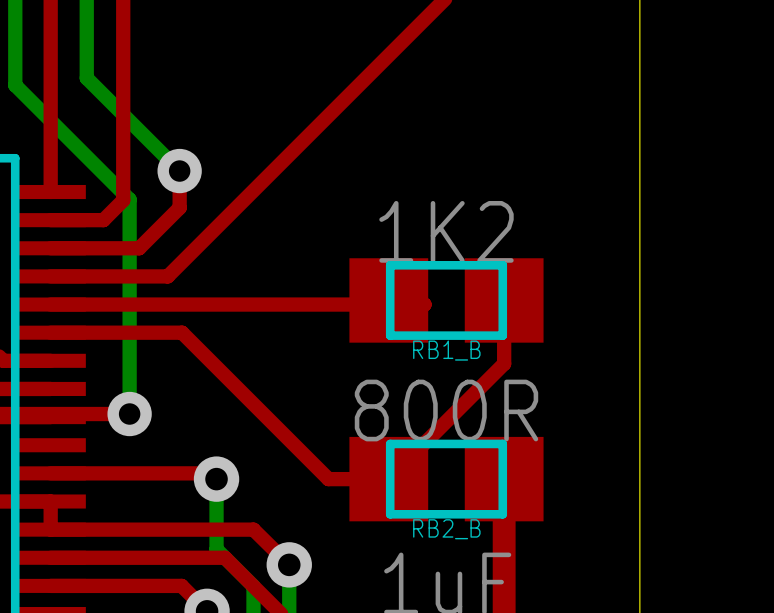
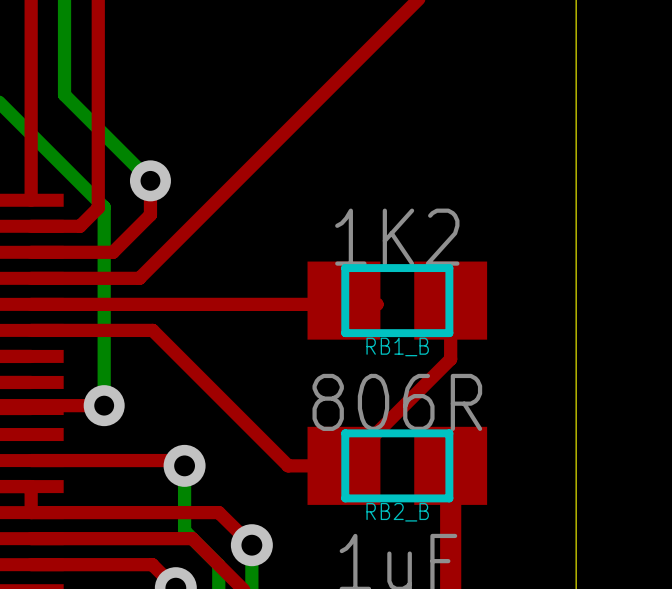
RB2_B value: 800R (446, 410) -> 806R (397, 402)

